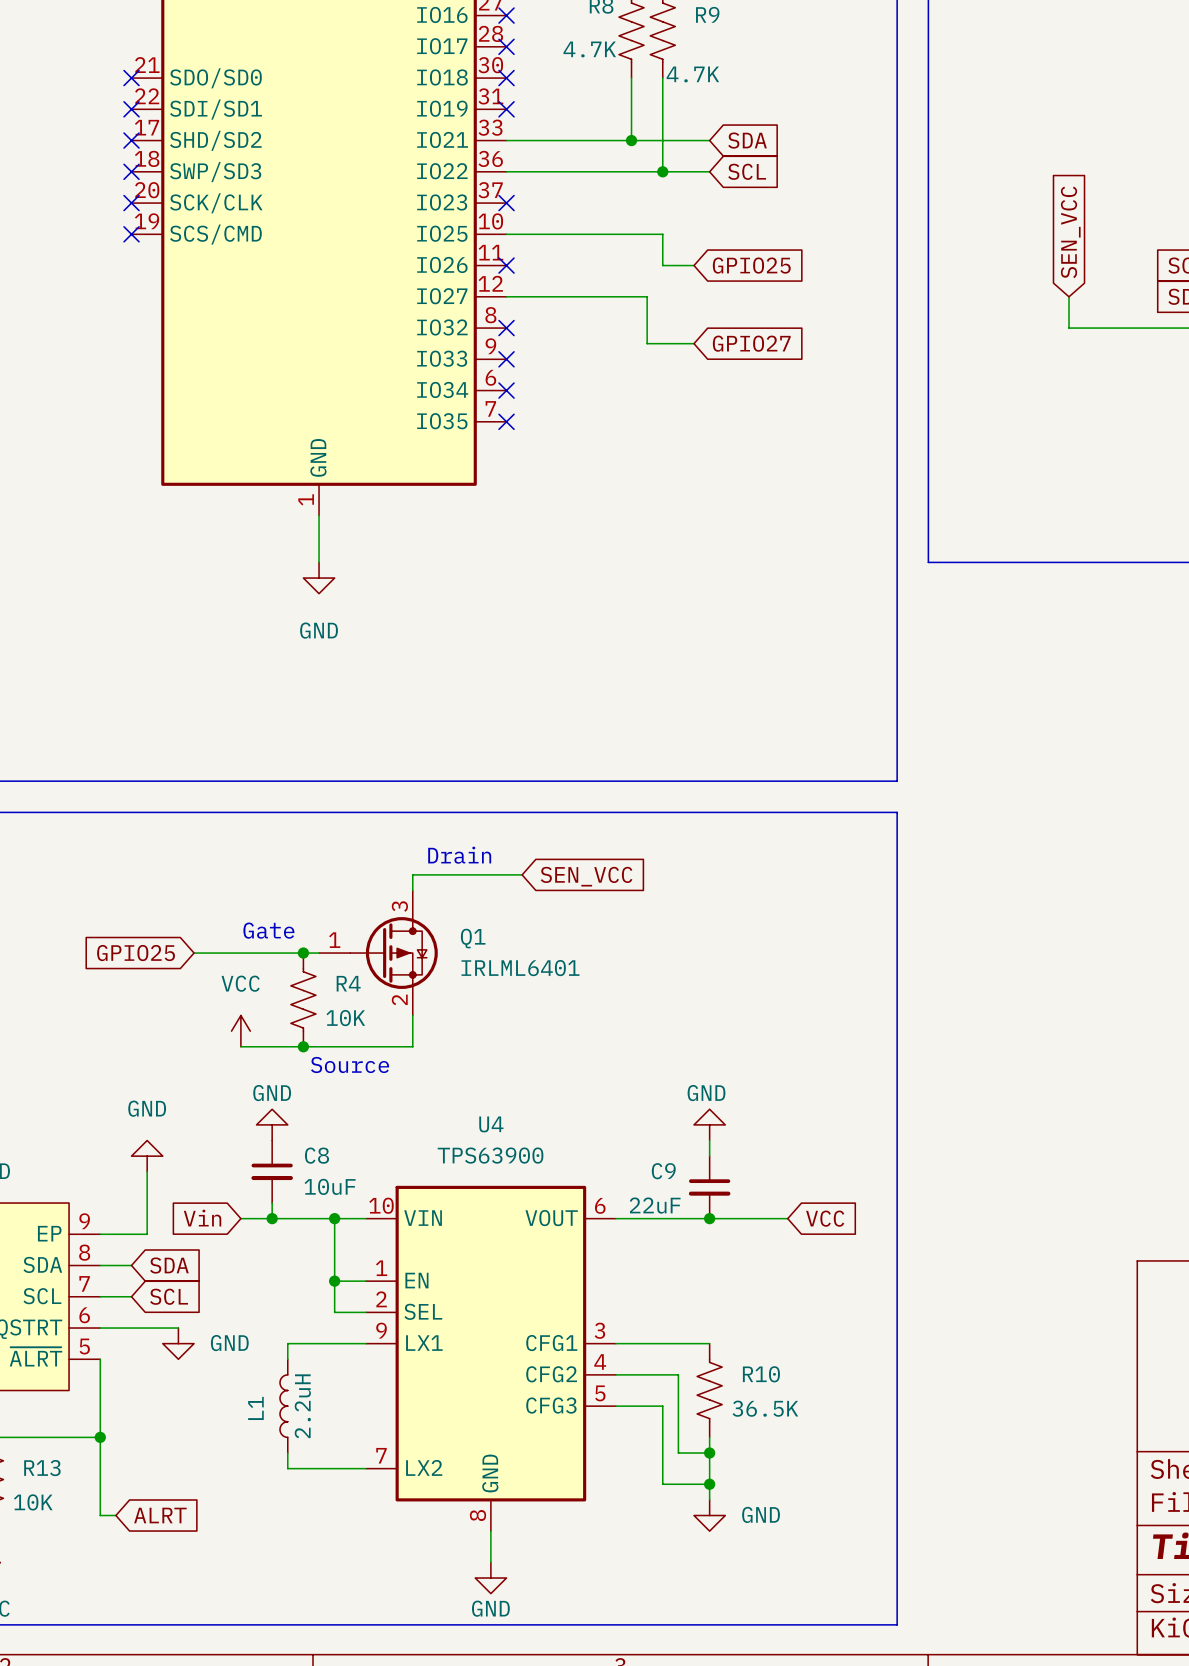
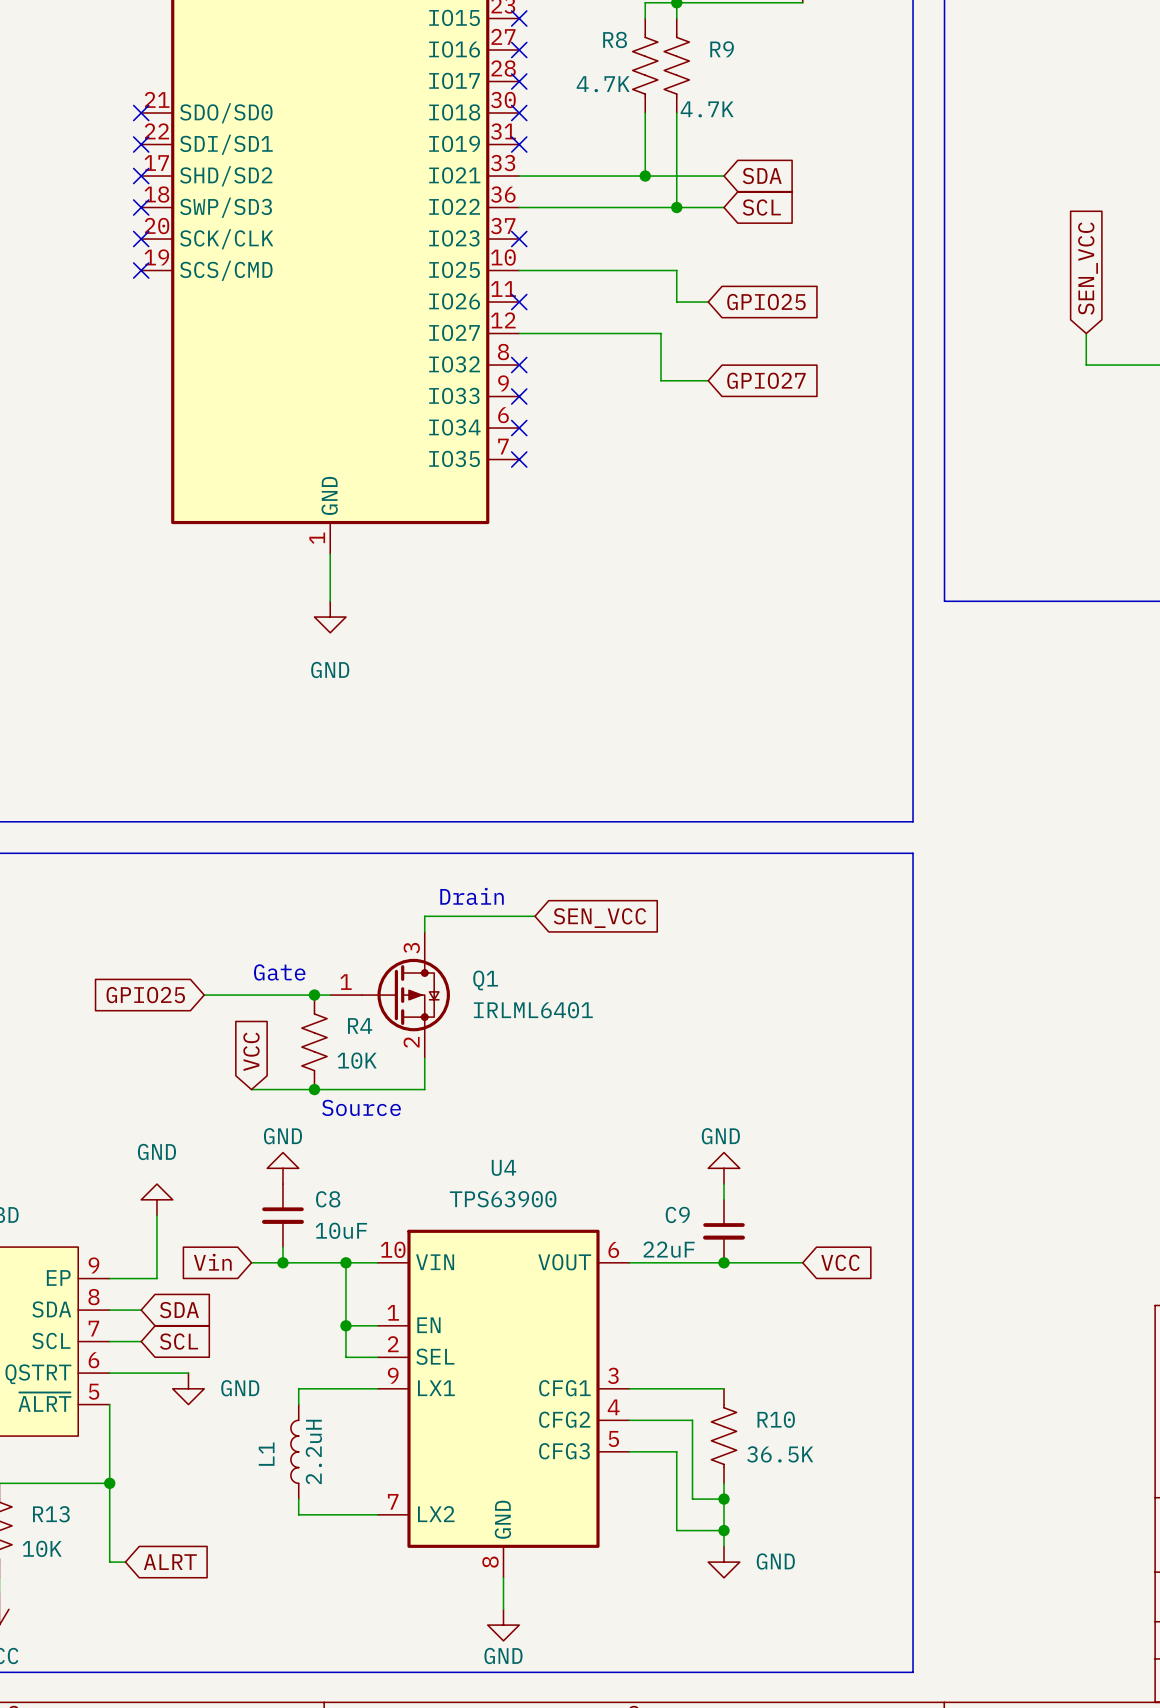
global label: none -> VCC (251, 1051)
power symbol: VCC (240, 1031) -> none

